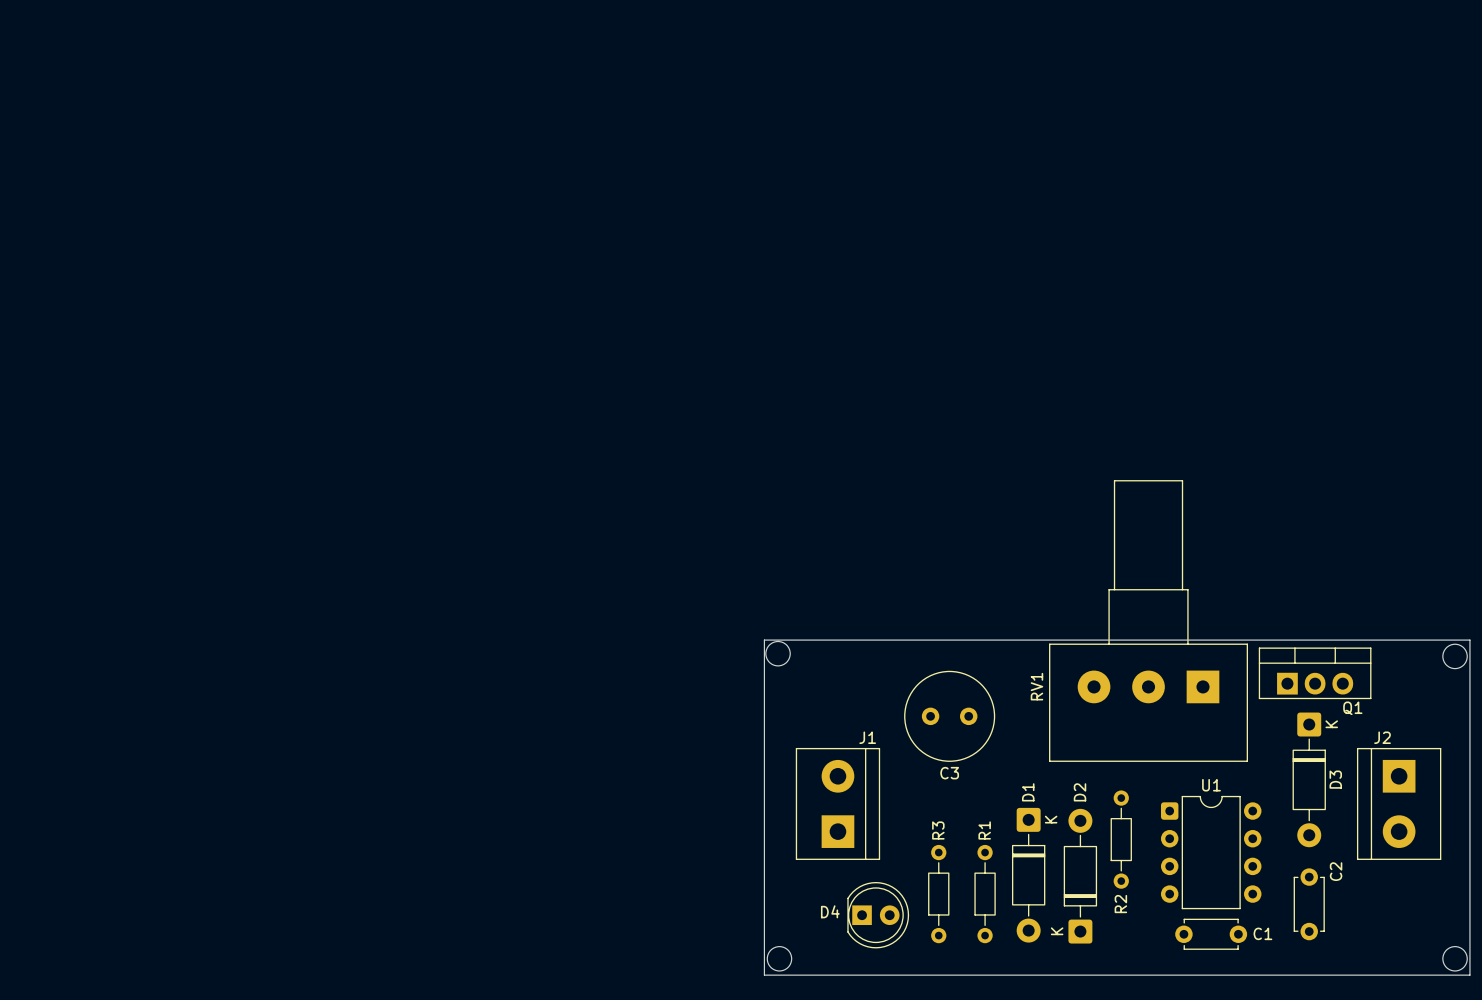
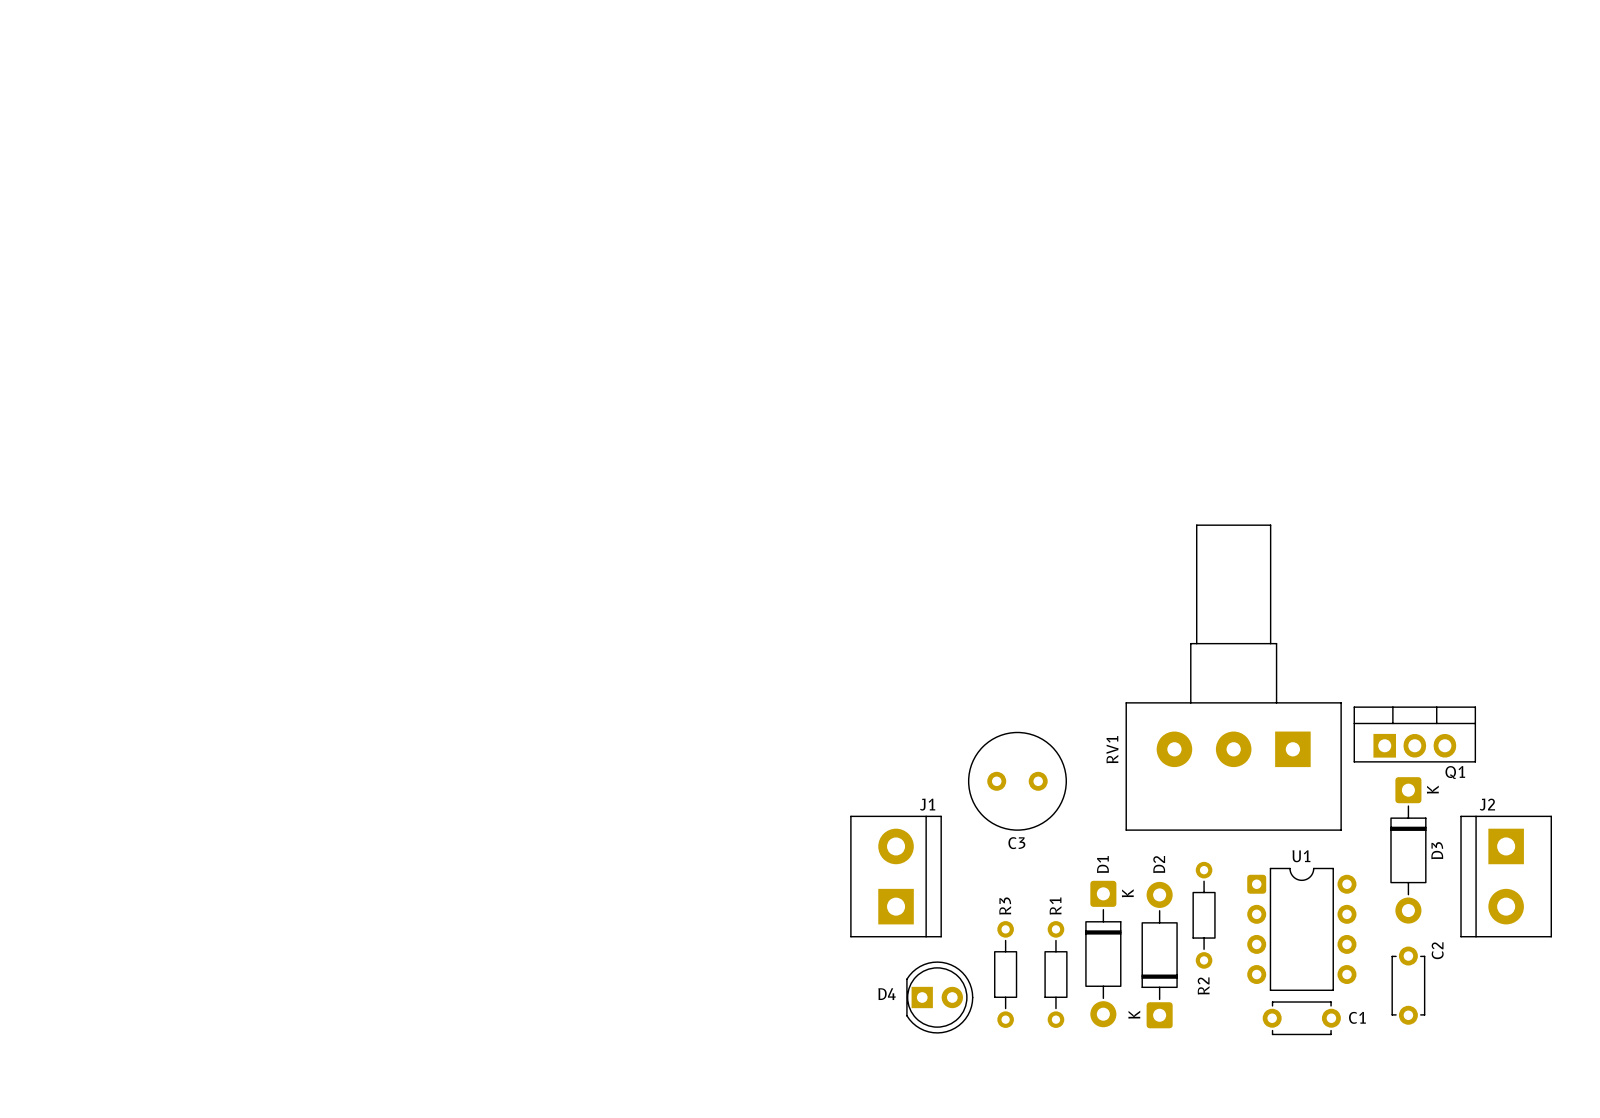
board edge: (764, 640) (1469, 640) (1469, 975) (764, 975) (764, 640) -> none
round board edge: [765, 641, 791, 667] -> none
round board edge: [1442, 643, 1468, 669] -> none
round board edge: [767, 946, 792, 972] -> none
round board edge: [1442, 946, 1468, 972] -> none

